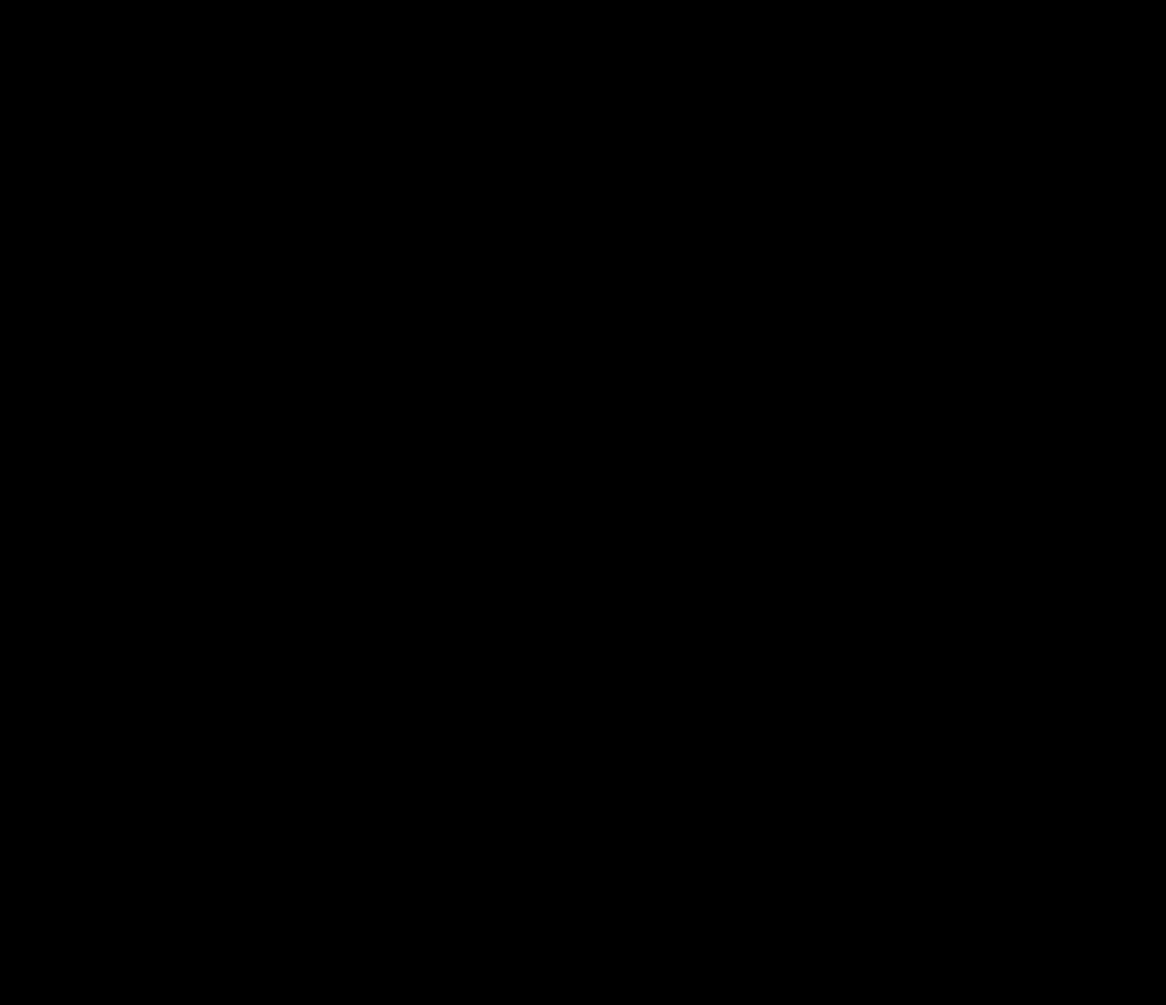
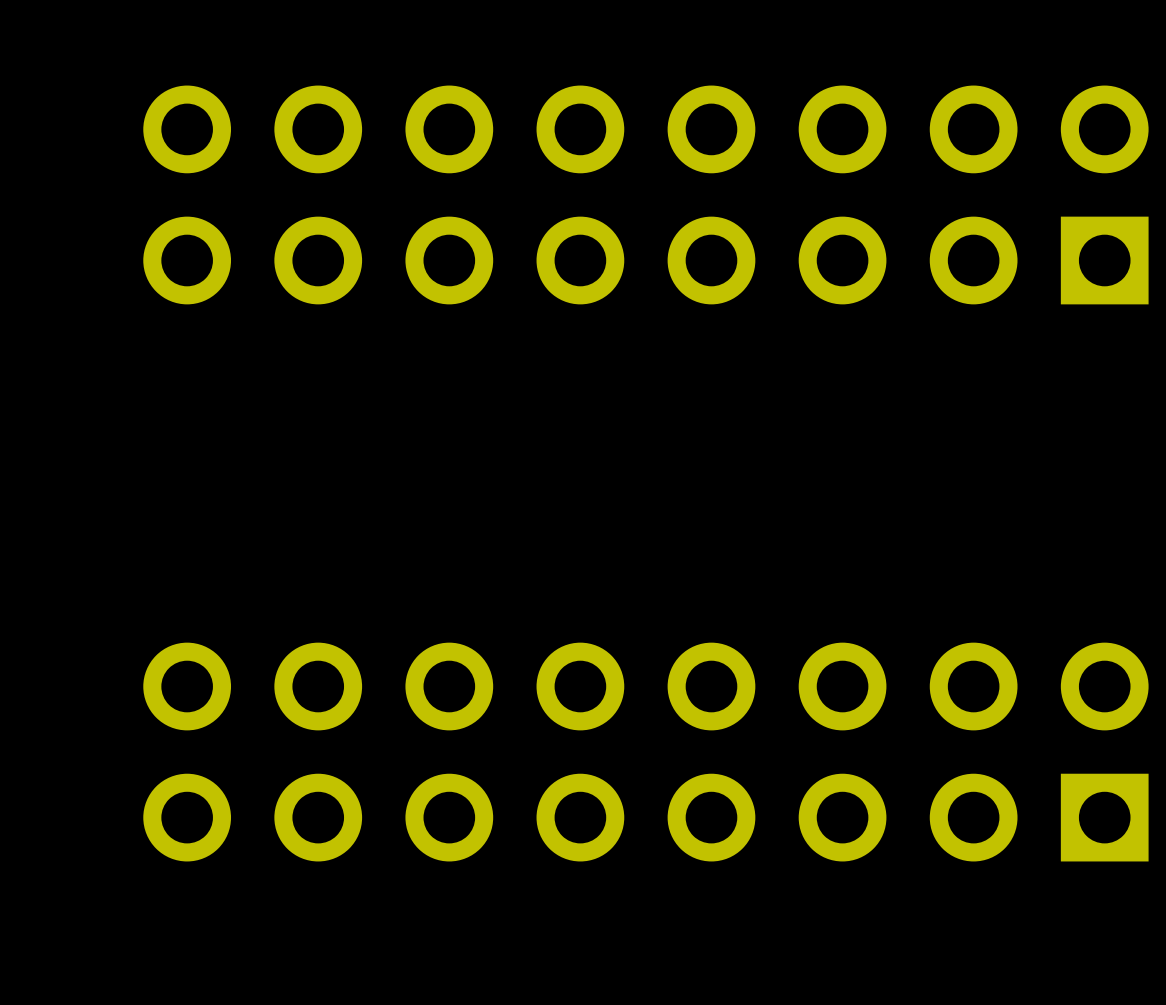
part: none -> (645, 194)
part: none -> (645, 752)

